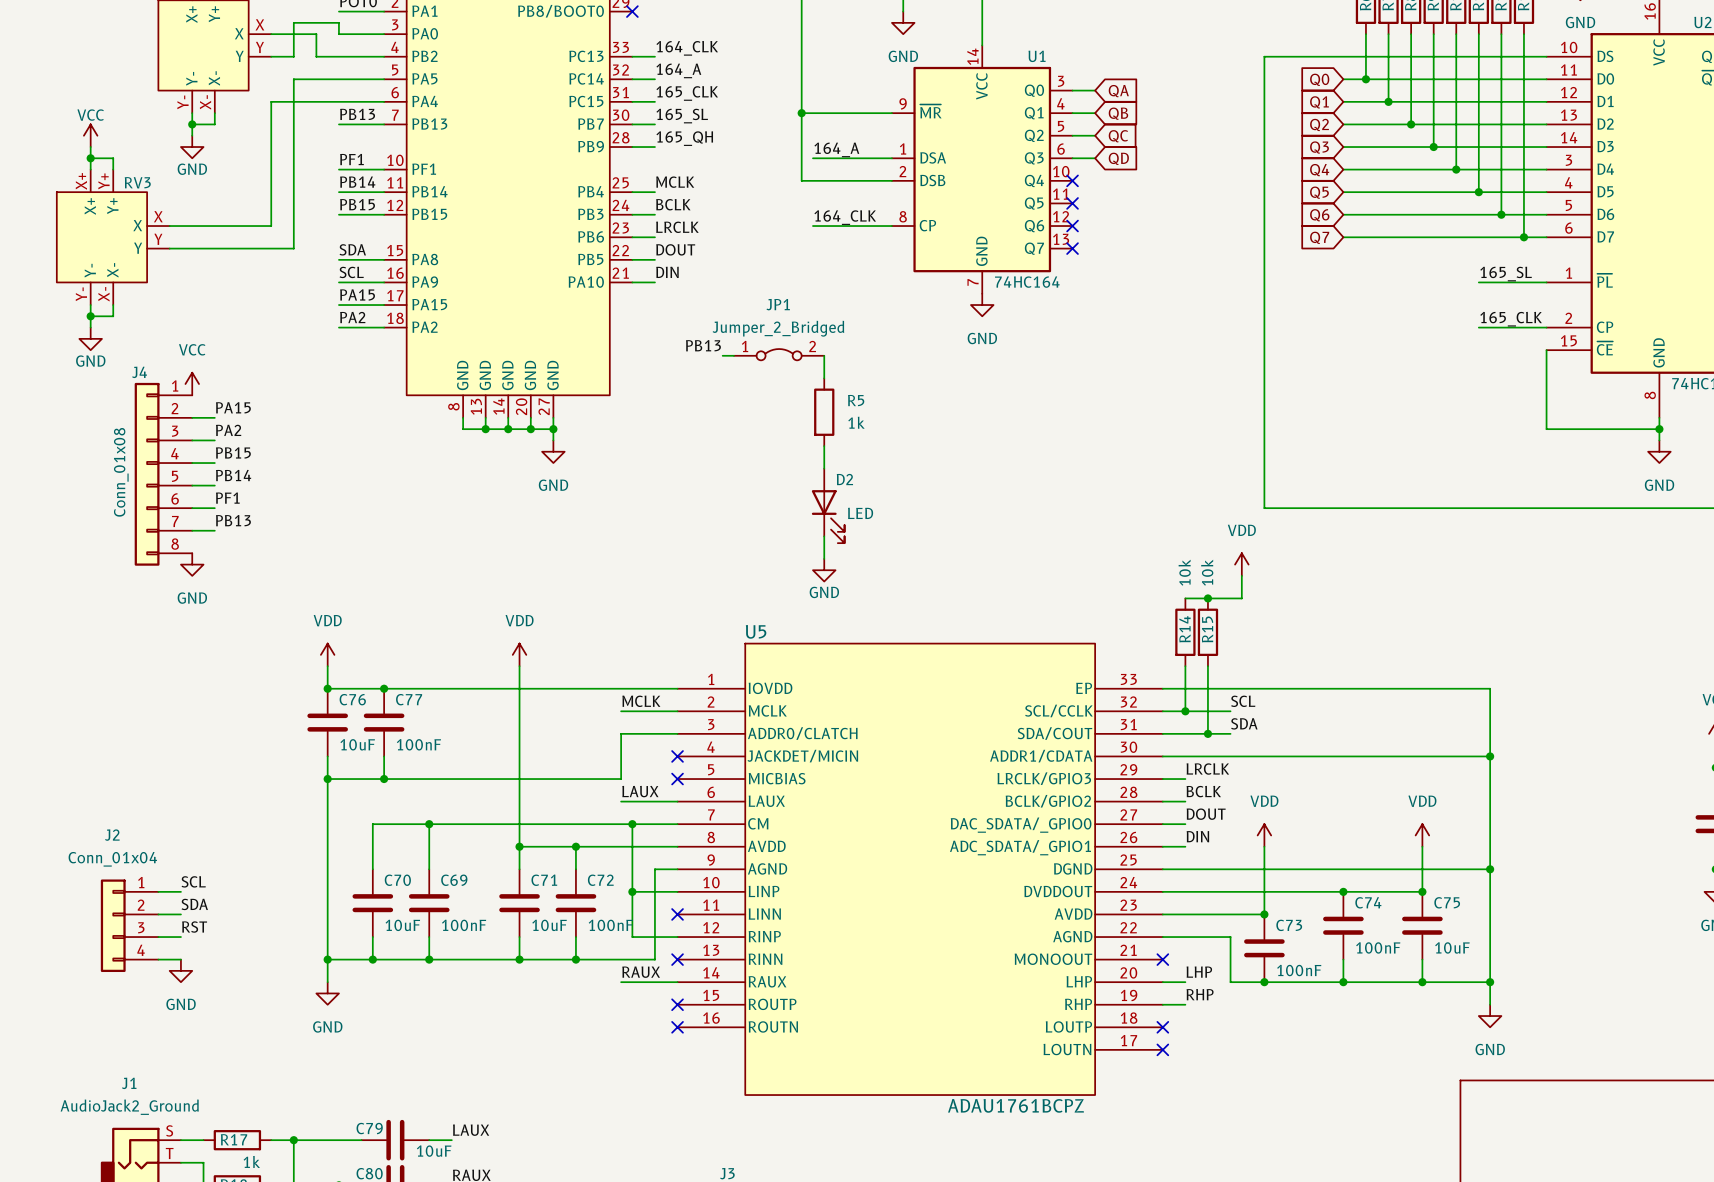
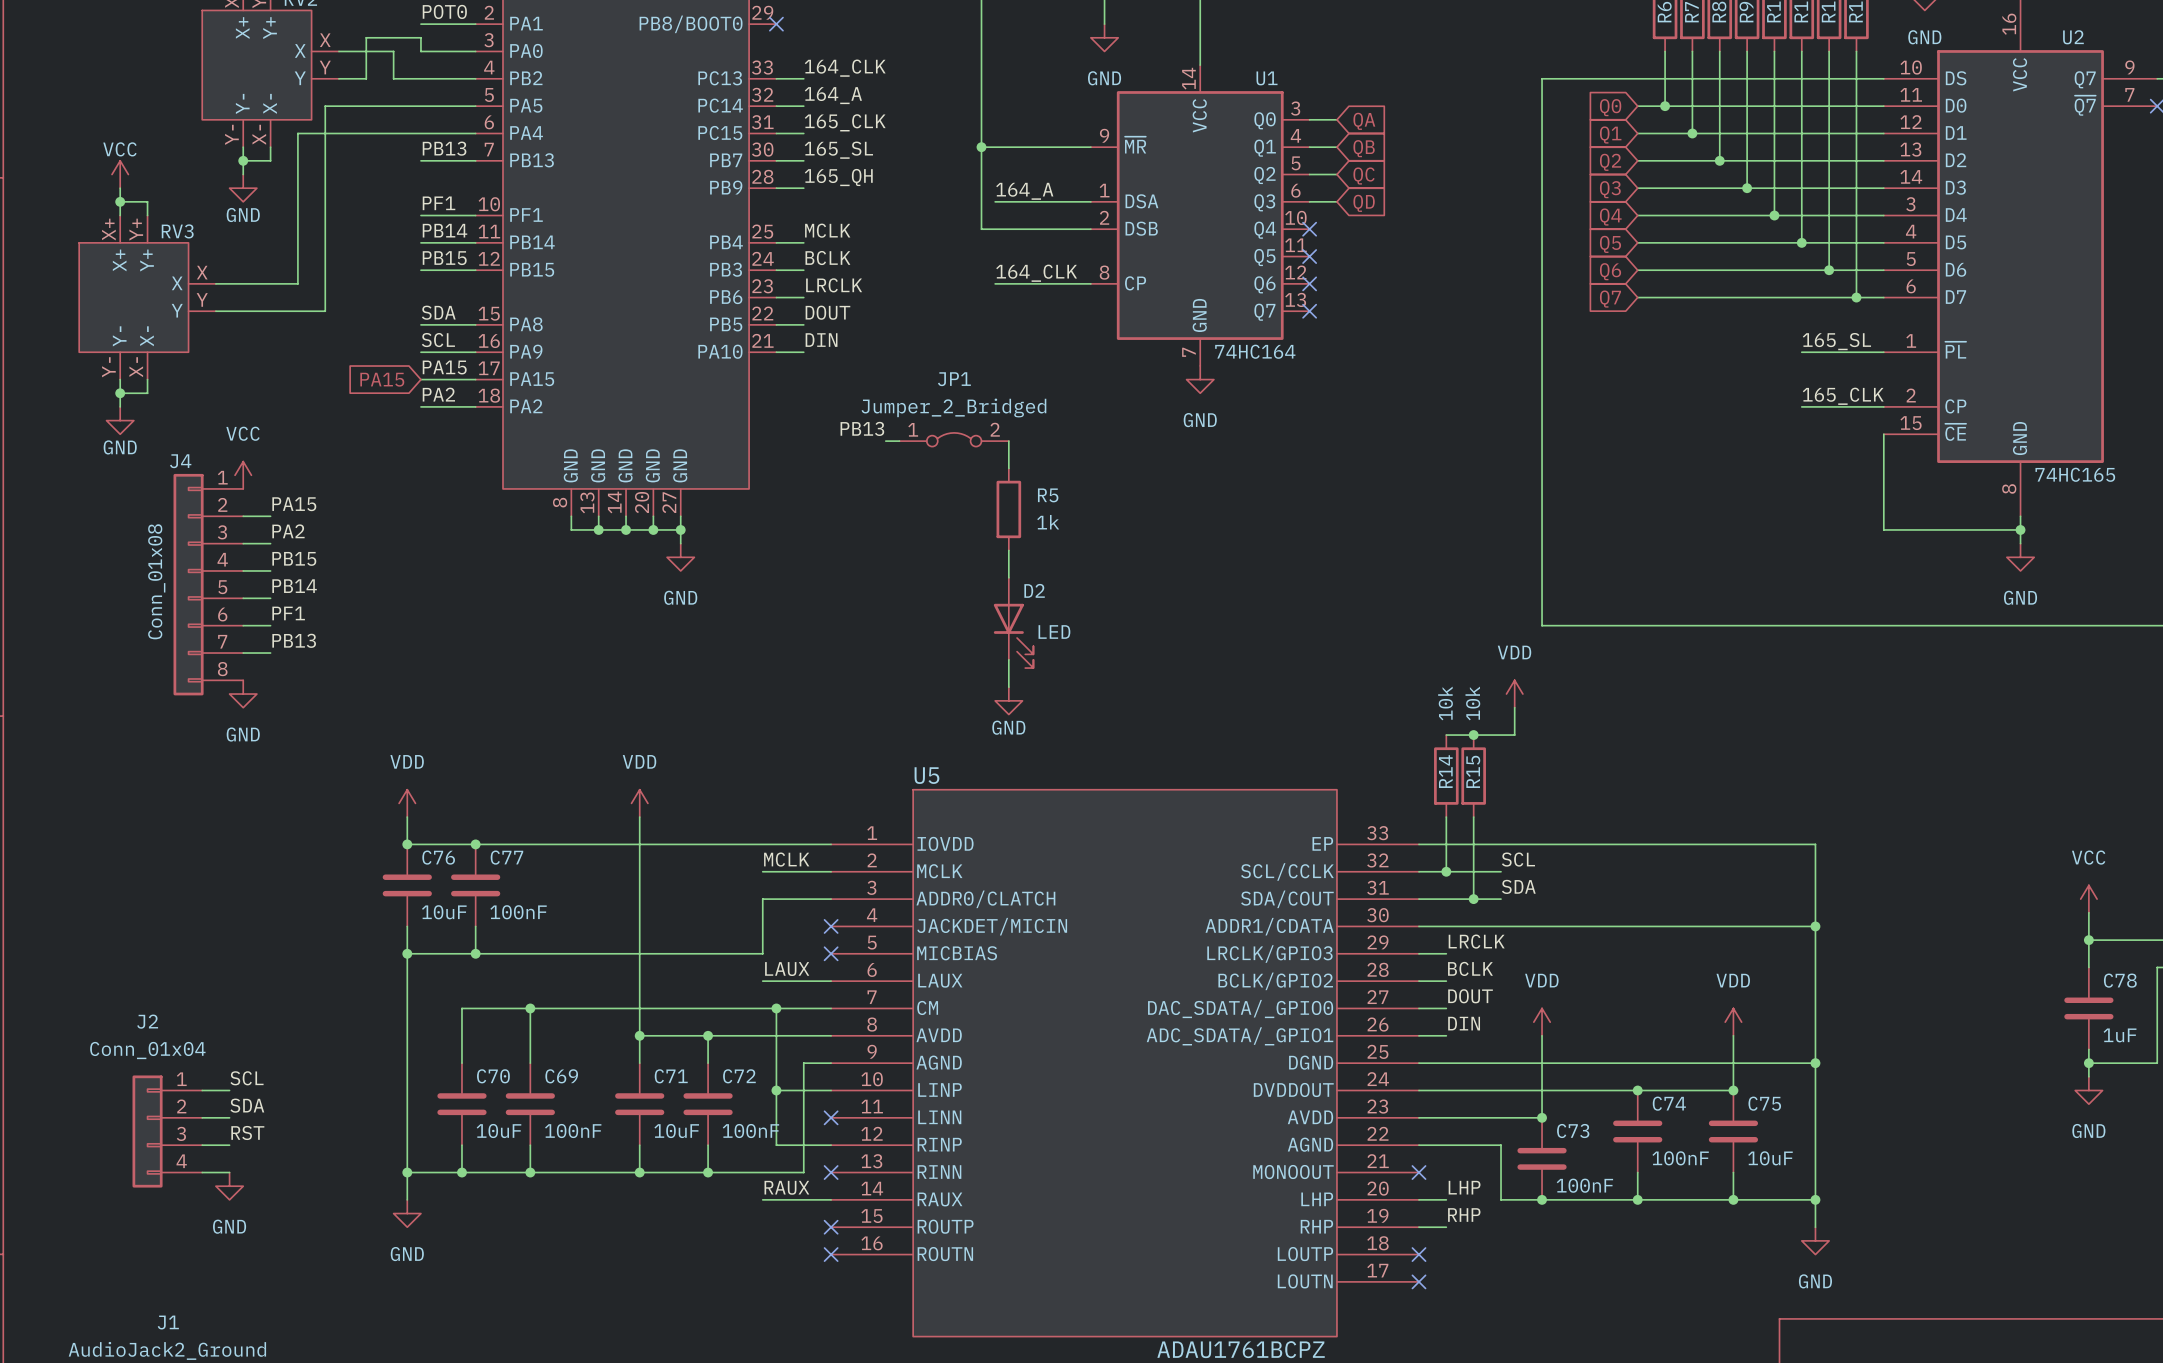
wire: (293, 79) (293, 248) (259, 248) -> (366, 106) (325, 106) (325, 311)
wire: (271, 101) (271, 226) (237, 226) -> (338, 133) (297, 133) (297, 283)
global label: none -> PA15 (382, 379)

